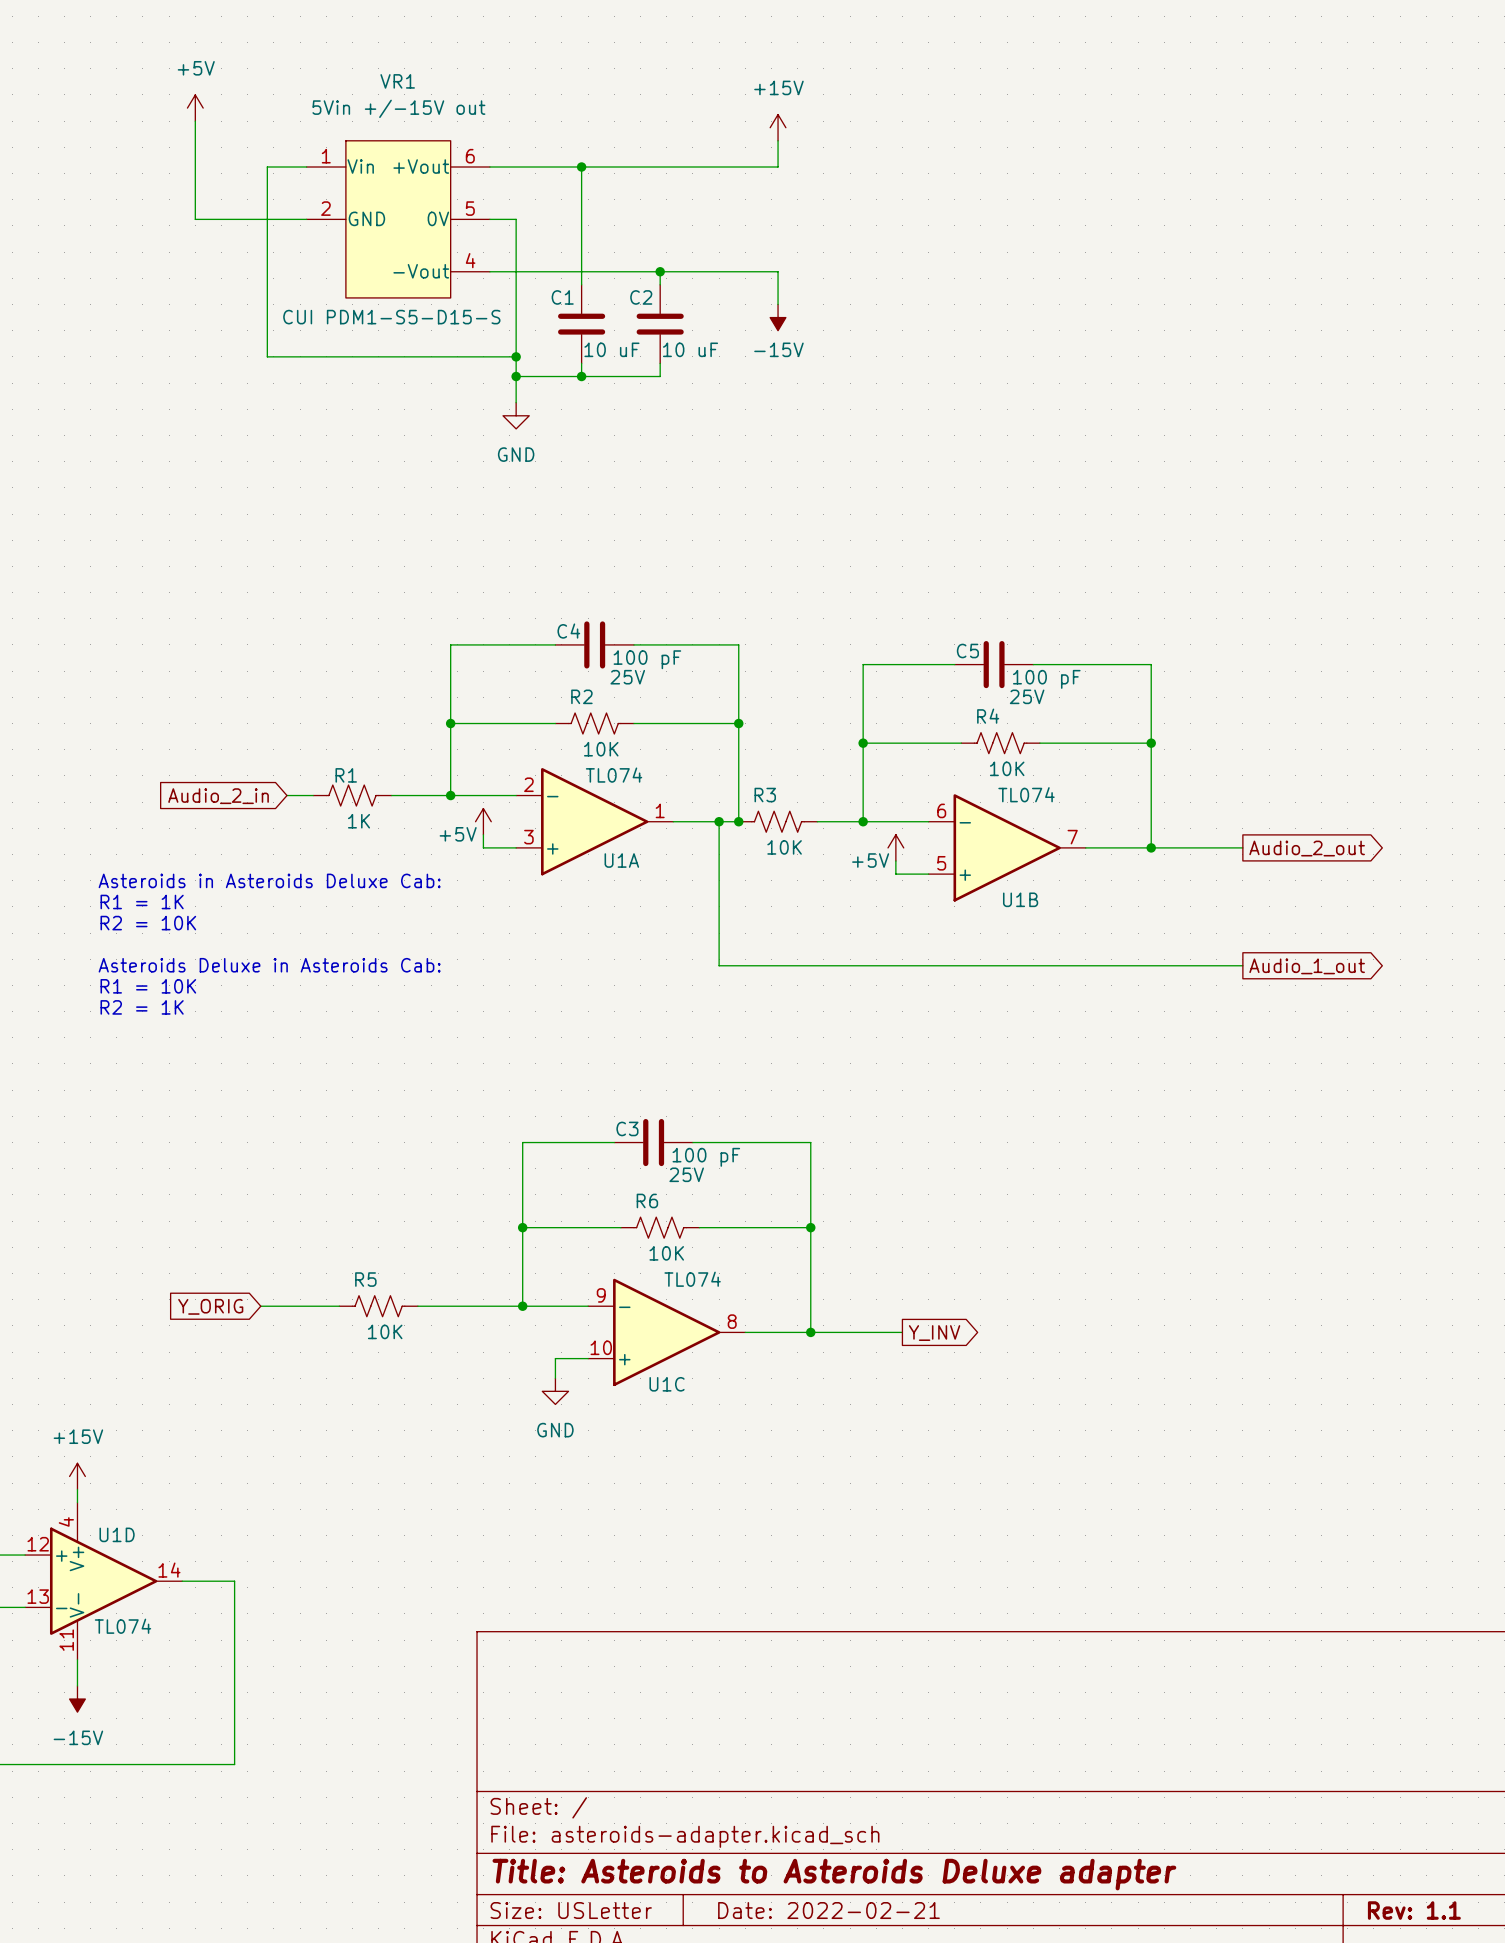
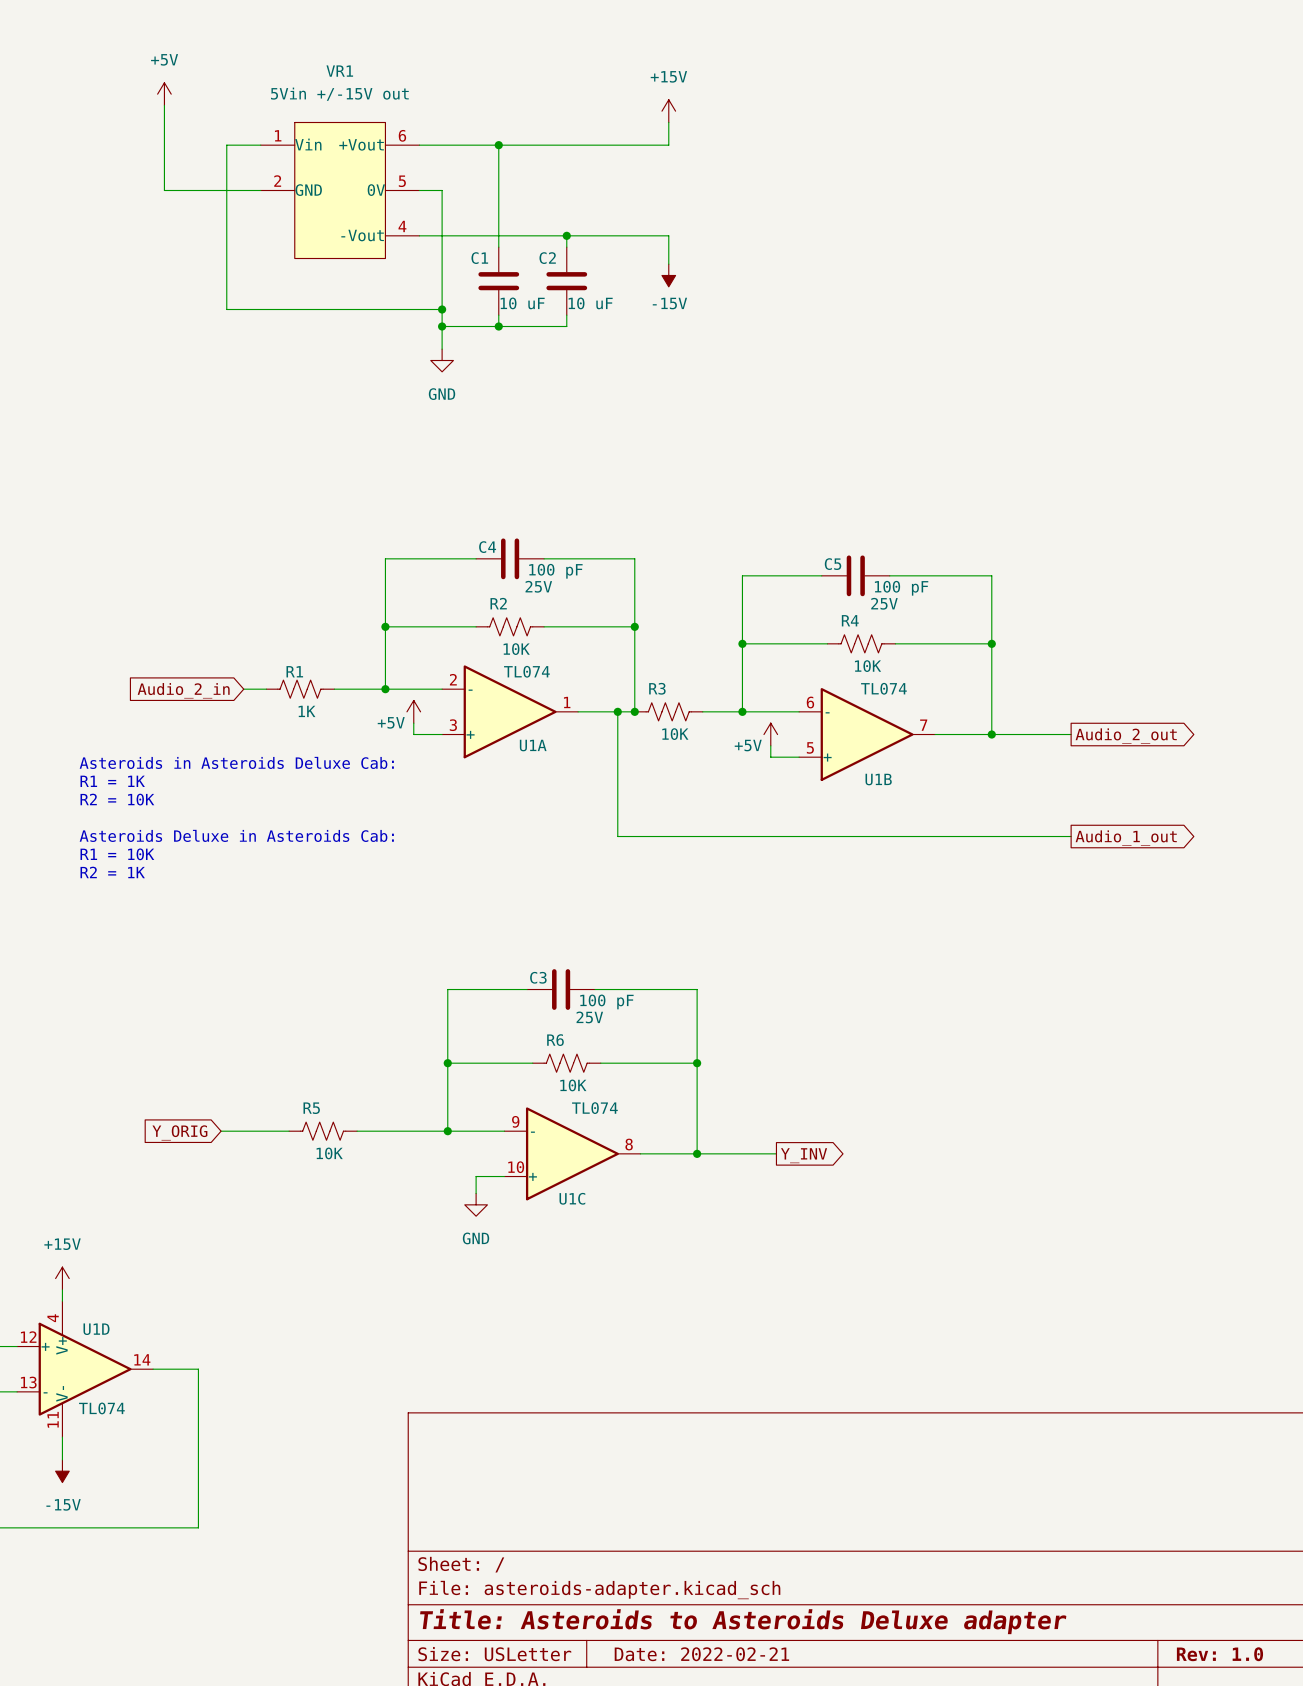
VR1 value: CUI PDM1-S5-D15-S (391, 317) -> none
title block: Rev: 1.1 (1414, 1910) -> Rev: 1.0 (1219, 1654)

